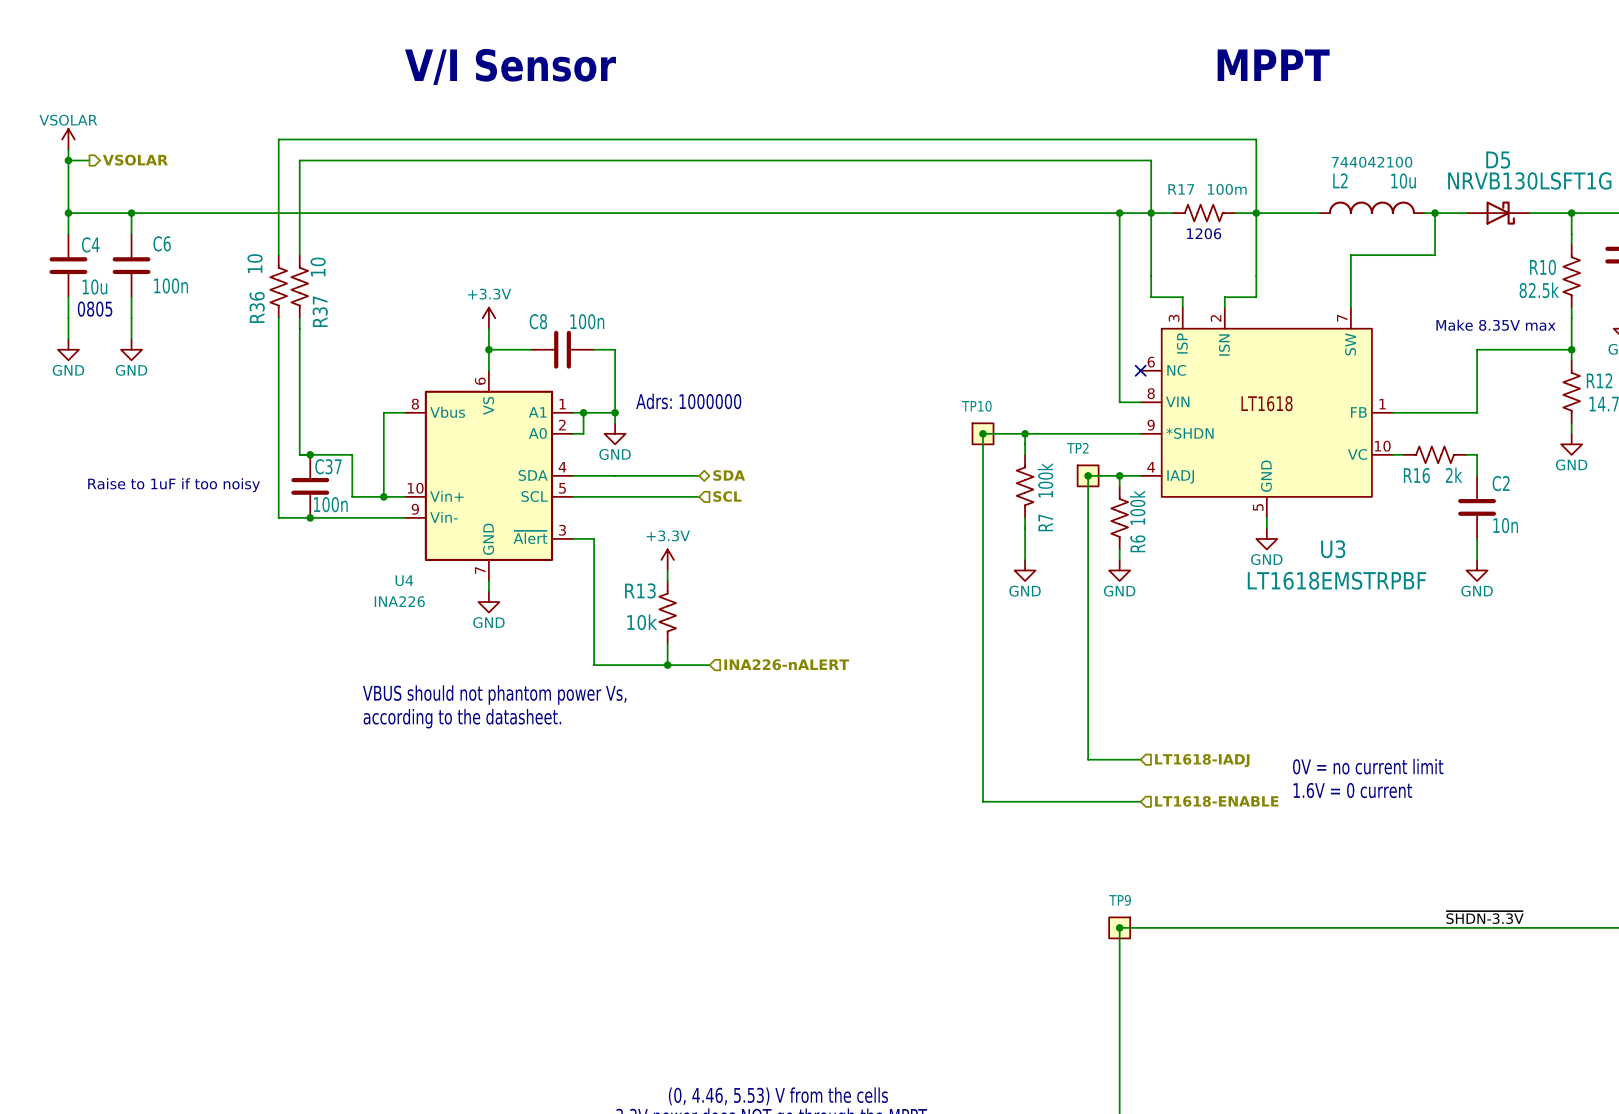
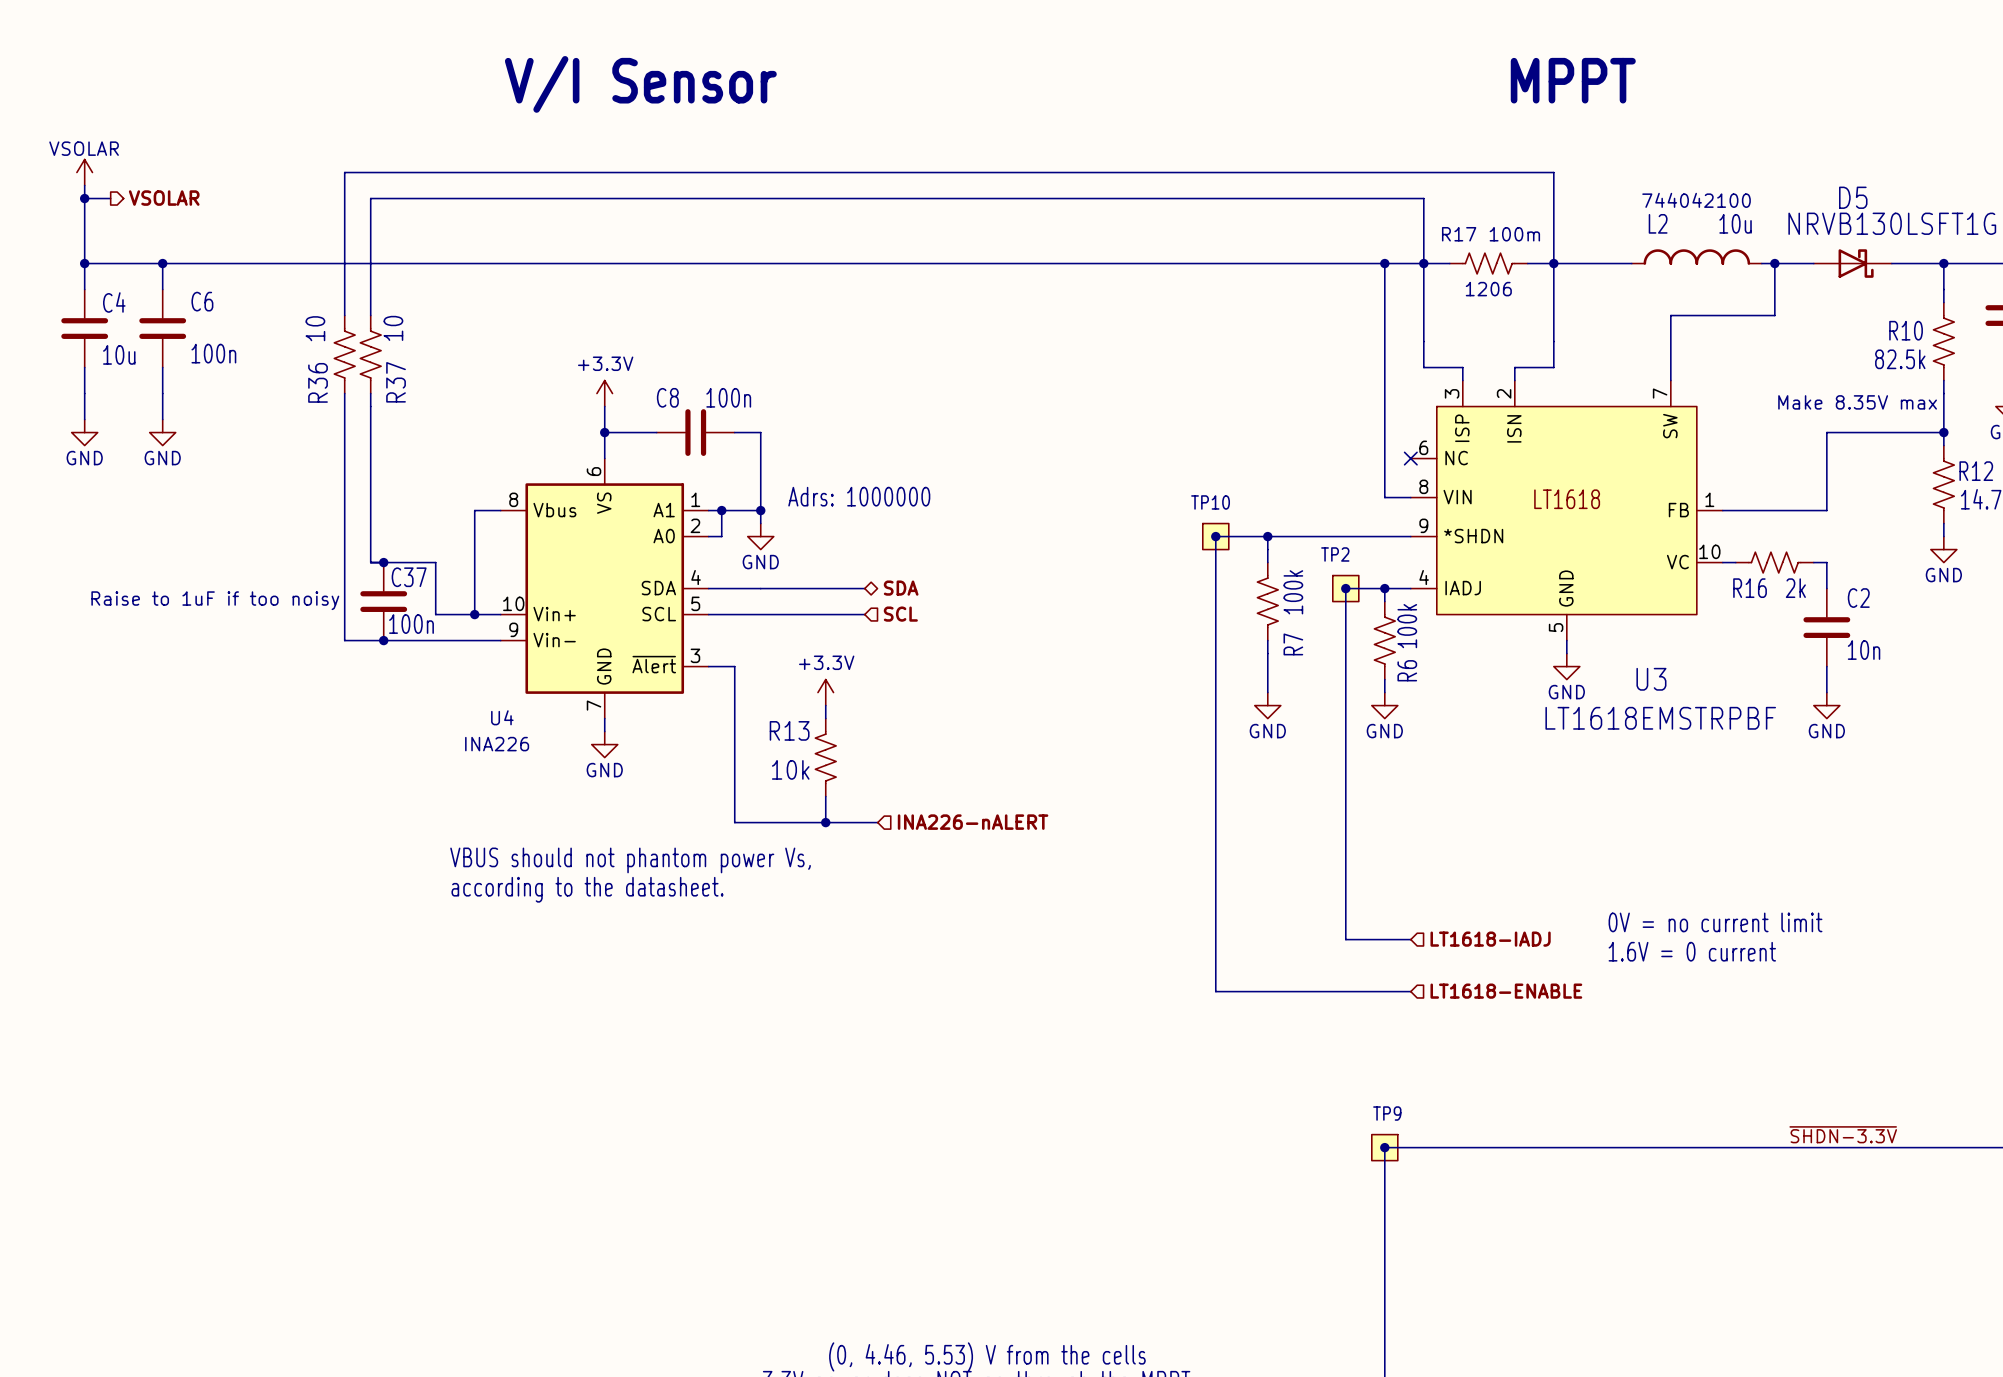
text: 0805 (95, 309) -> none
text: none -> 0V = no current limit (1715, 922)
text: 0V = no current limit (1368, 766) -> 1.6V = 0 current (1692, 951)
text: 1.6V = 0 current (1352, 790) -> none

